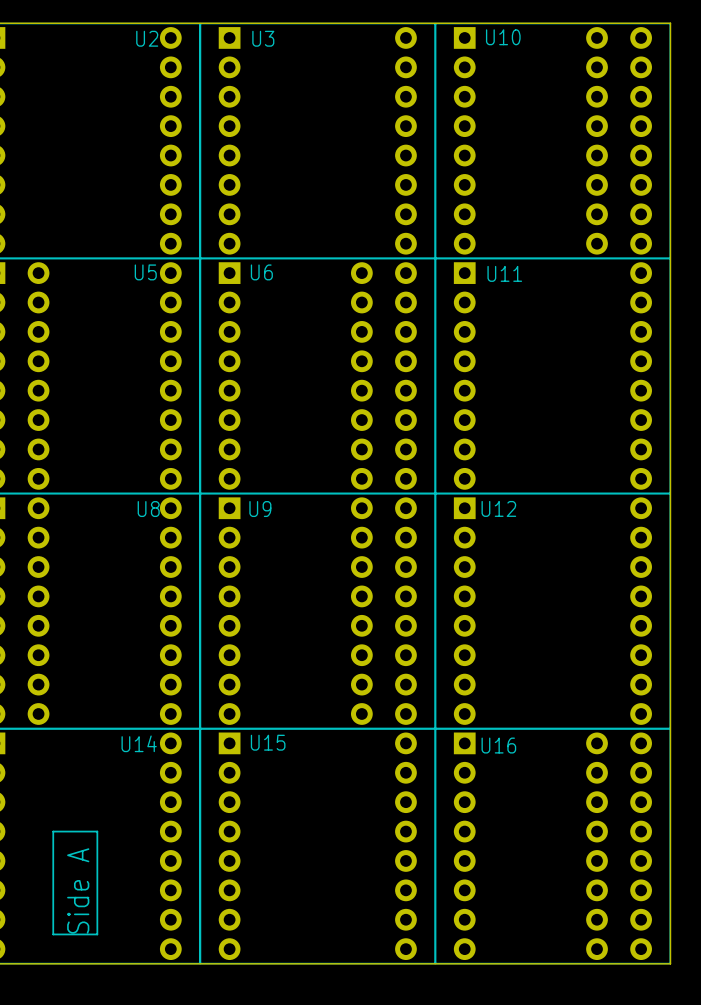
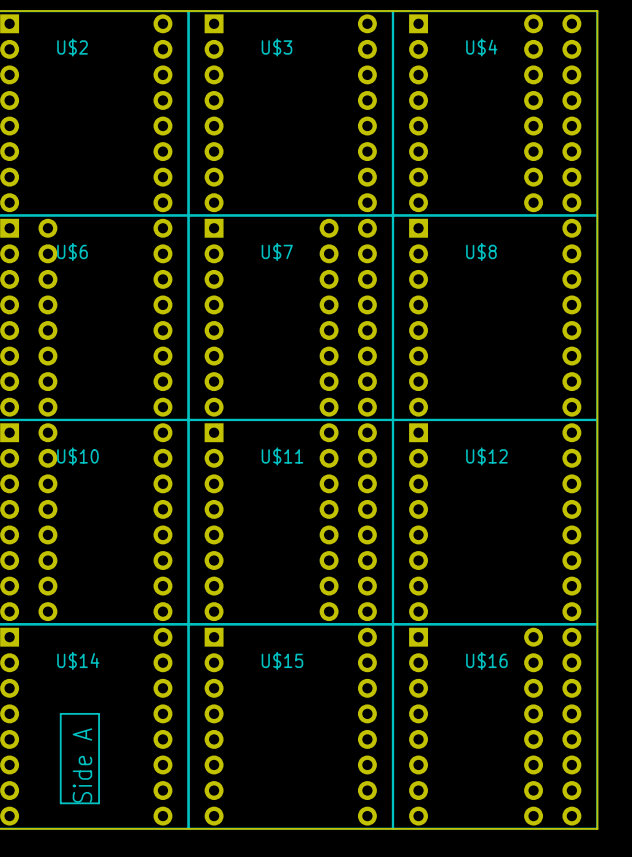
U10 name: U10 (503, 37) -> U$4 (481, 47)
U2 name: U2 (147, 38) -> U$2 (72, 47)
U3 name: U3 (263, 38) -> U$3 (276, 47)
U5 name: U5 (145, 272) -> U$6 (72, 251)
U6 name: U6 (261, 272) -> U$7 (277, 251)
U11 name: U11 (504, 273) -> U$8 (481, 251)
U12 name: U12 (498, 508) -> U$12 (486, 456)
U8 name: U8 (148, 509) -> U$10 (78, 456)
U9 name: U9 (260, 509) -> U$11 (282, 456)
U15 name: U15 (268, 742) -> U$15 (282, 660)
U14 name: U14 (139, 743) -> U$14 (78, 660)
U16 name: U16 (498, 745) -> U$16 (486, 660)

